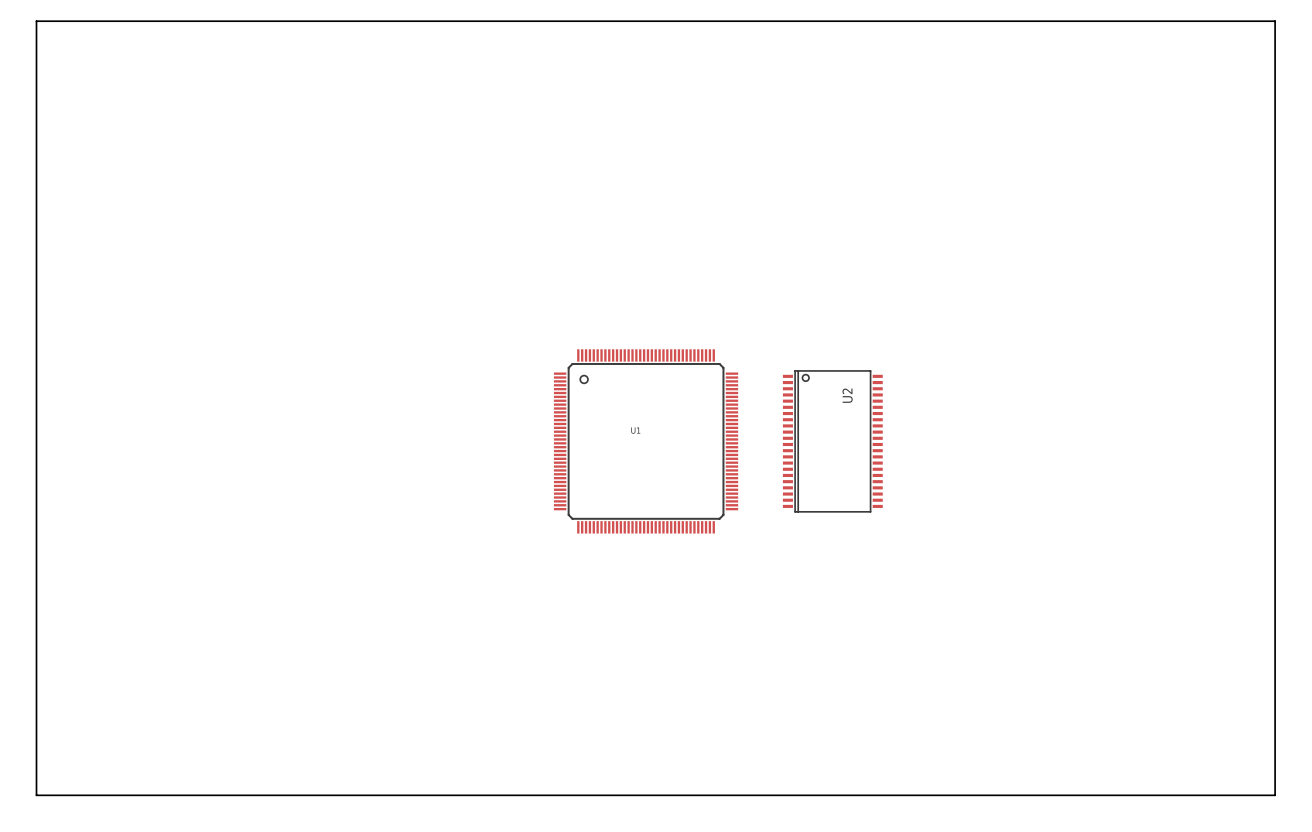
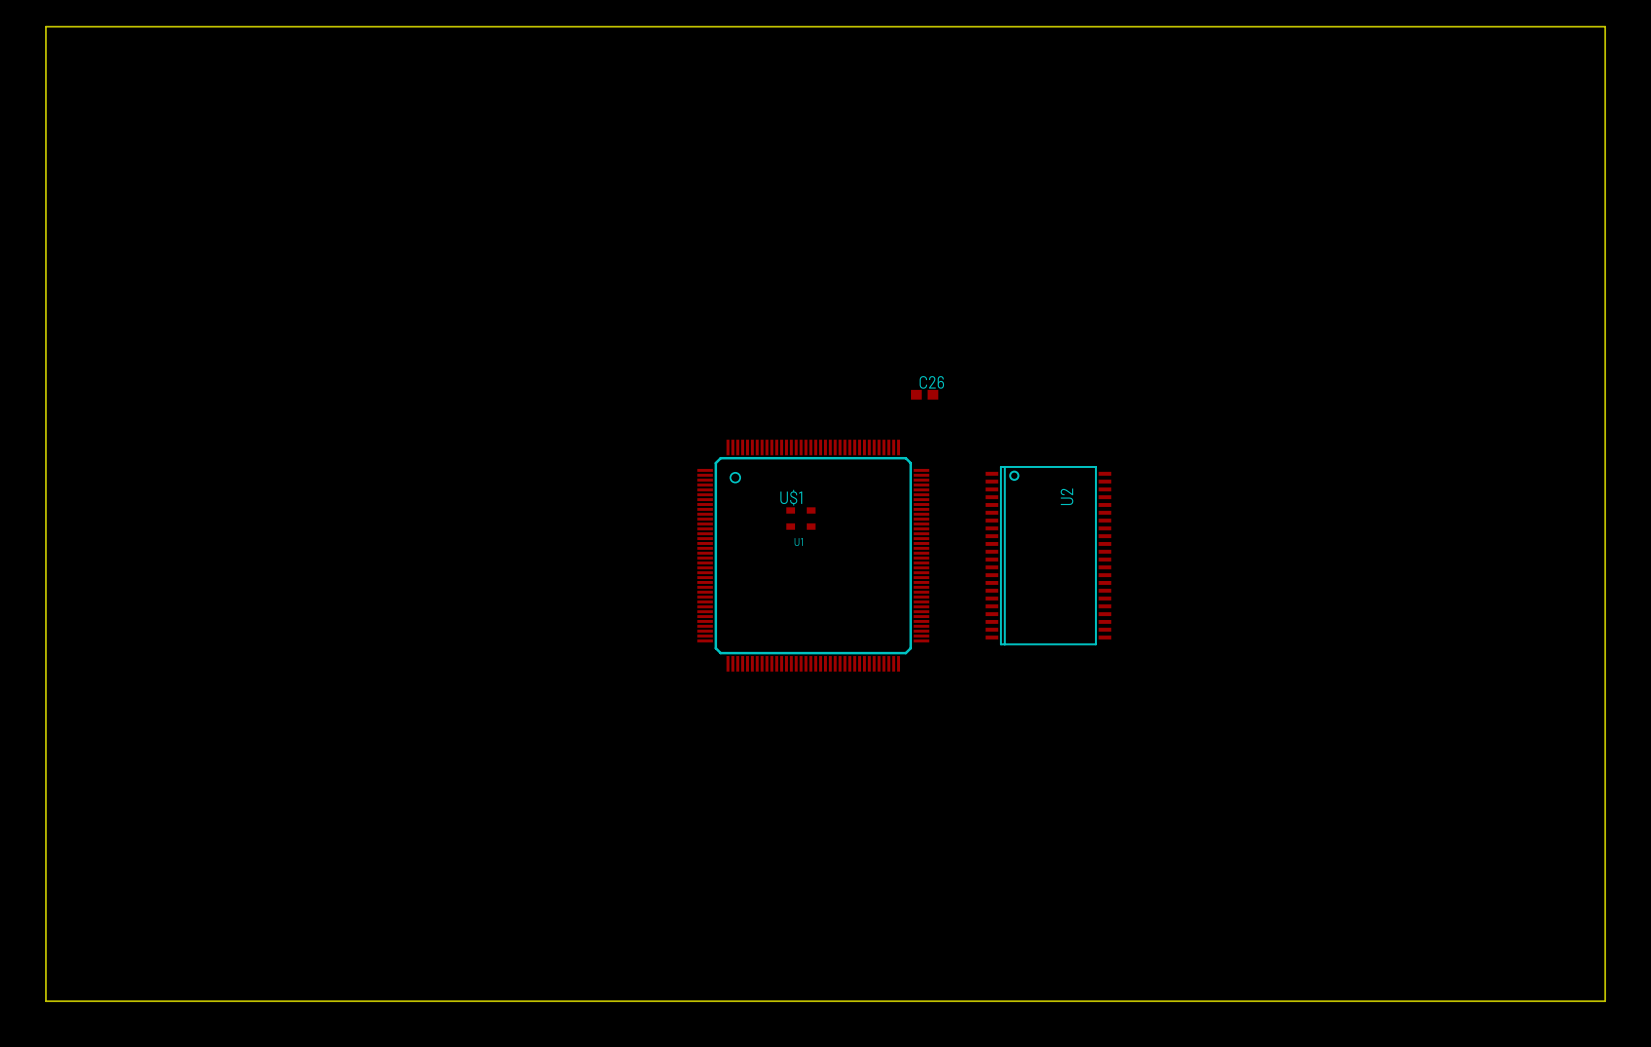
C26: none -> (924, 394)
U$1: none -> (800, 518)

